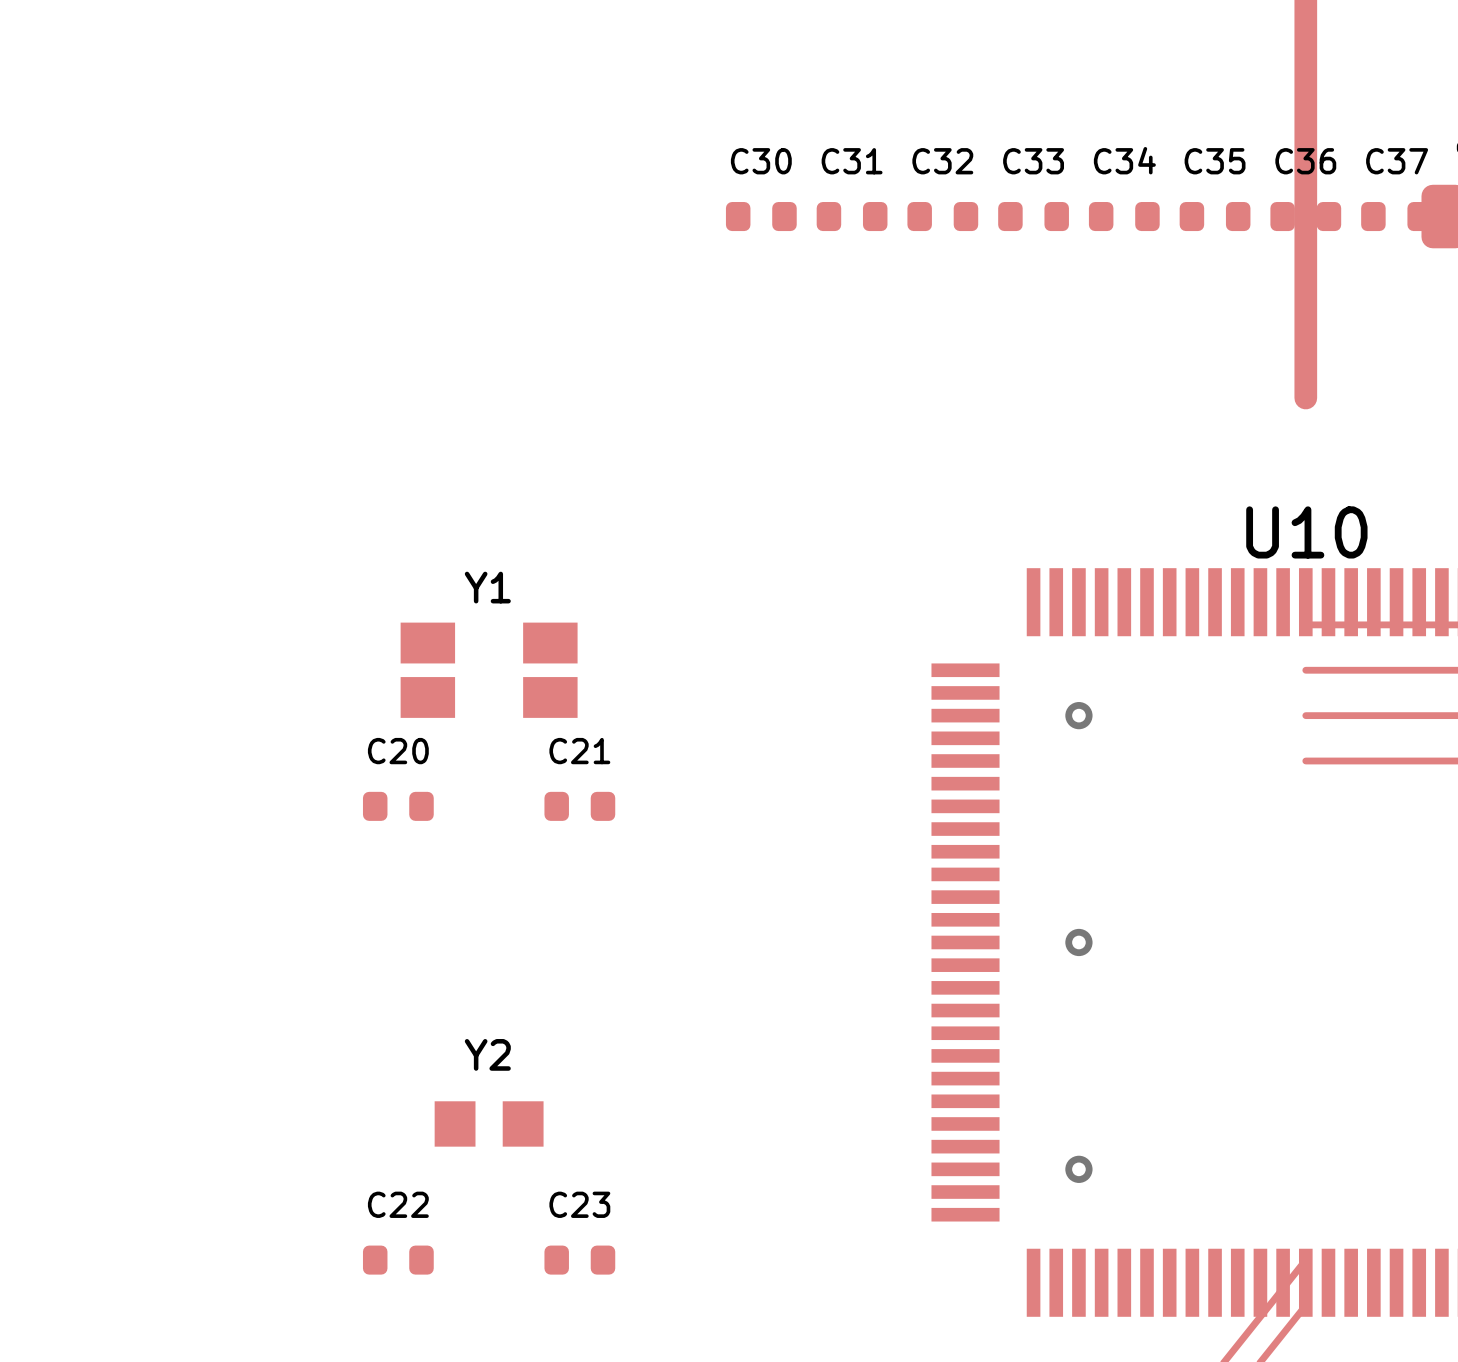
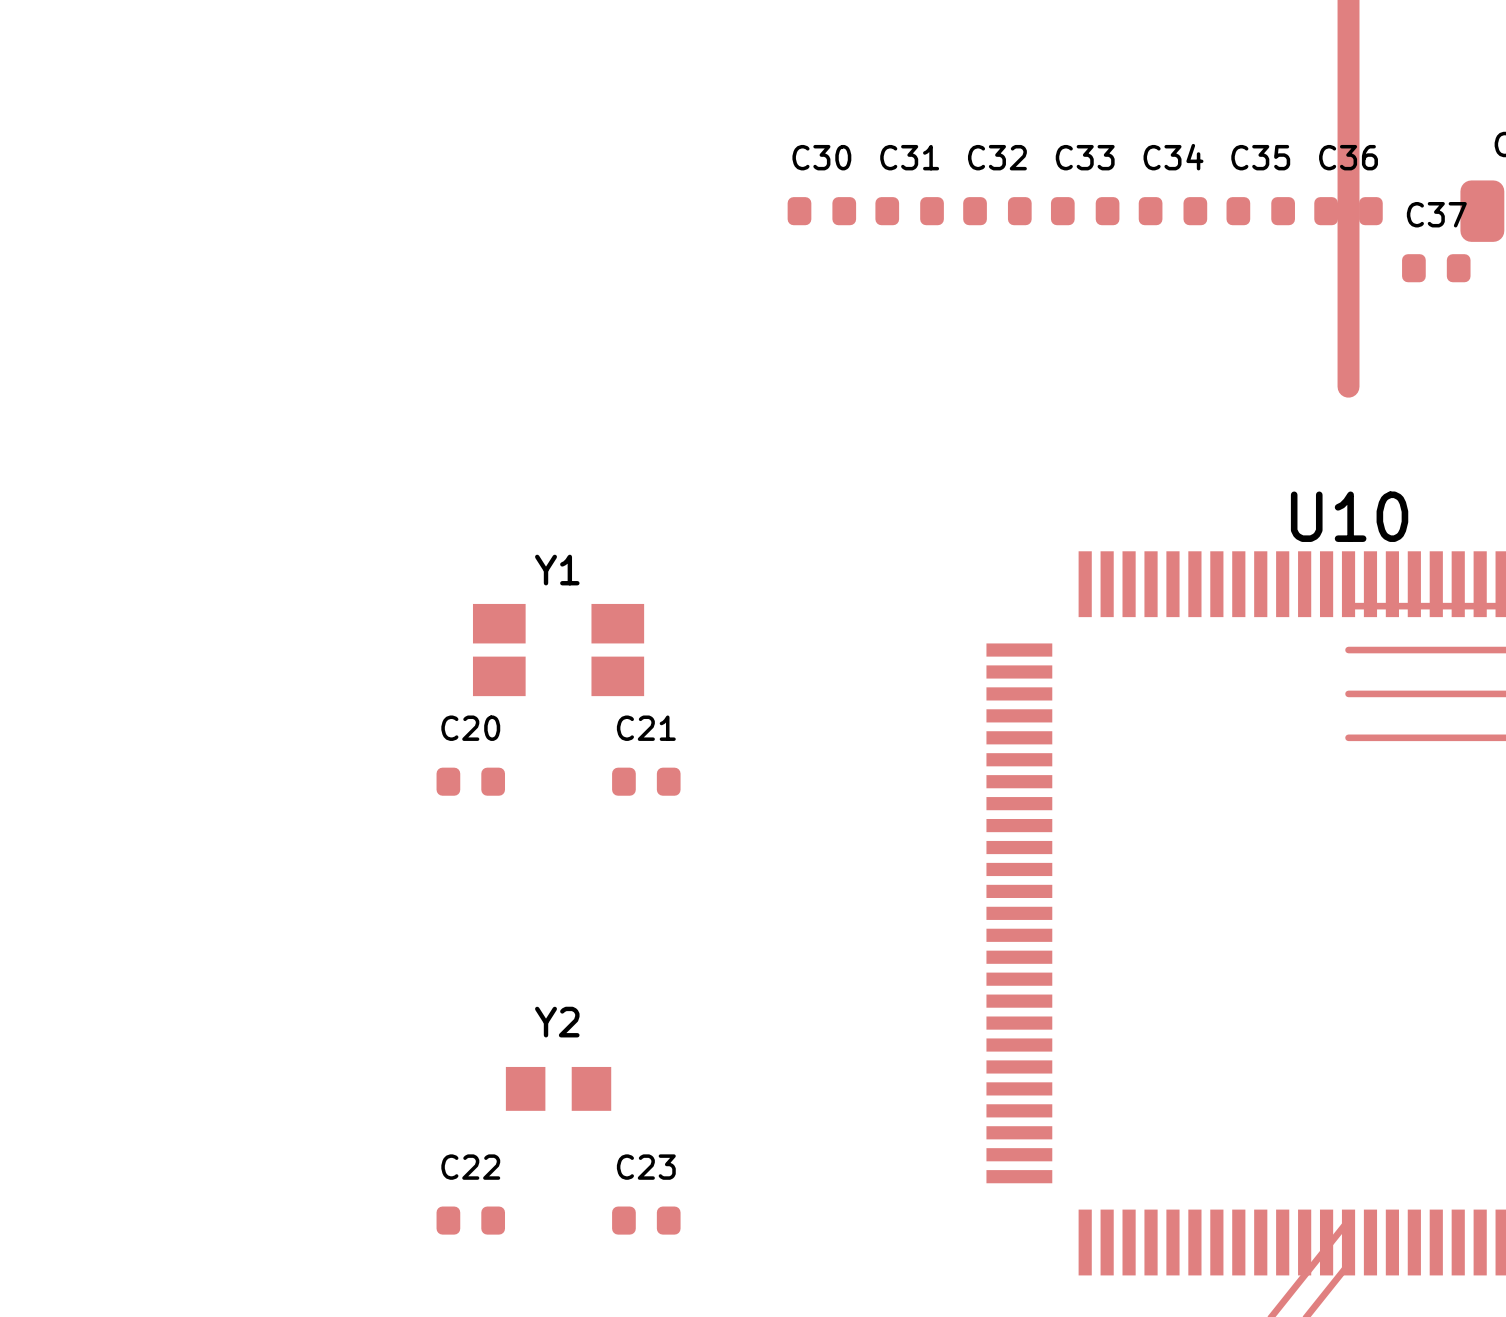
C37 position: (1396, 216) -> (1436, 268)
via: (1078, 715) -> none
via: (1078, 942) -> none
via: (1078, 1169) -> none

